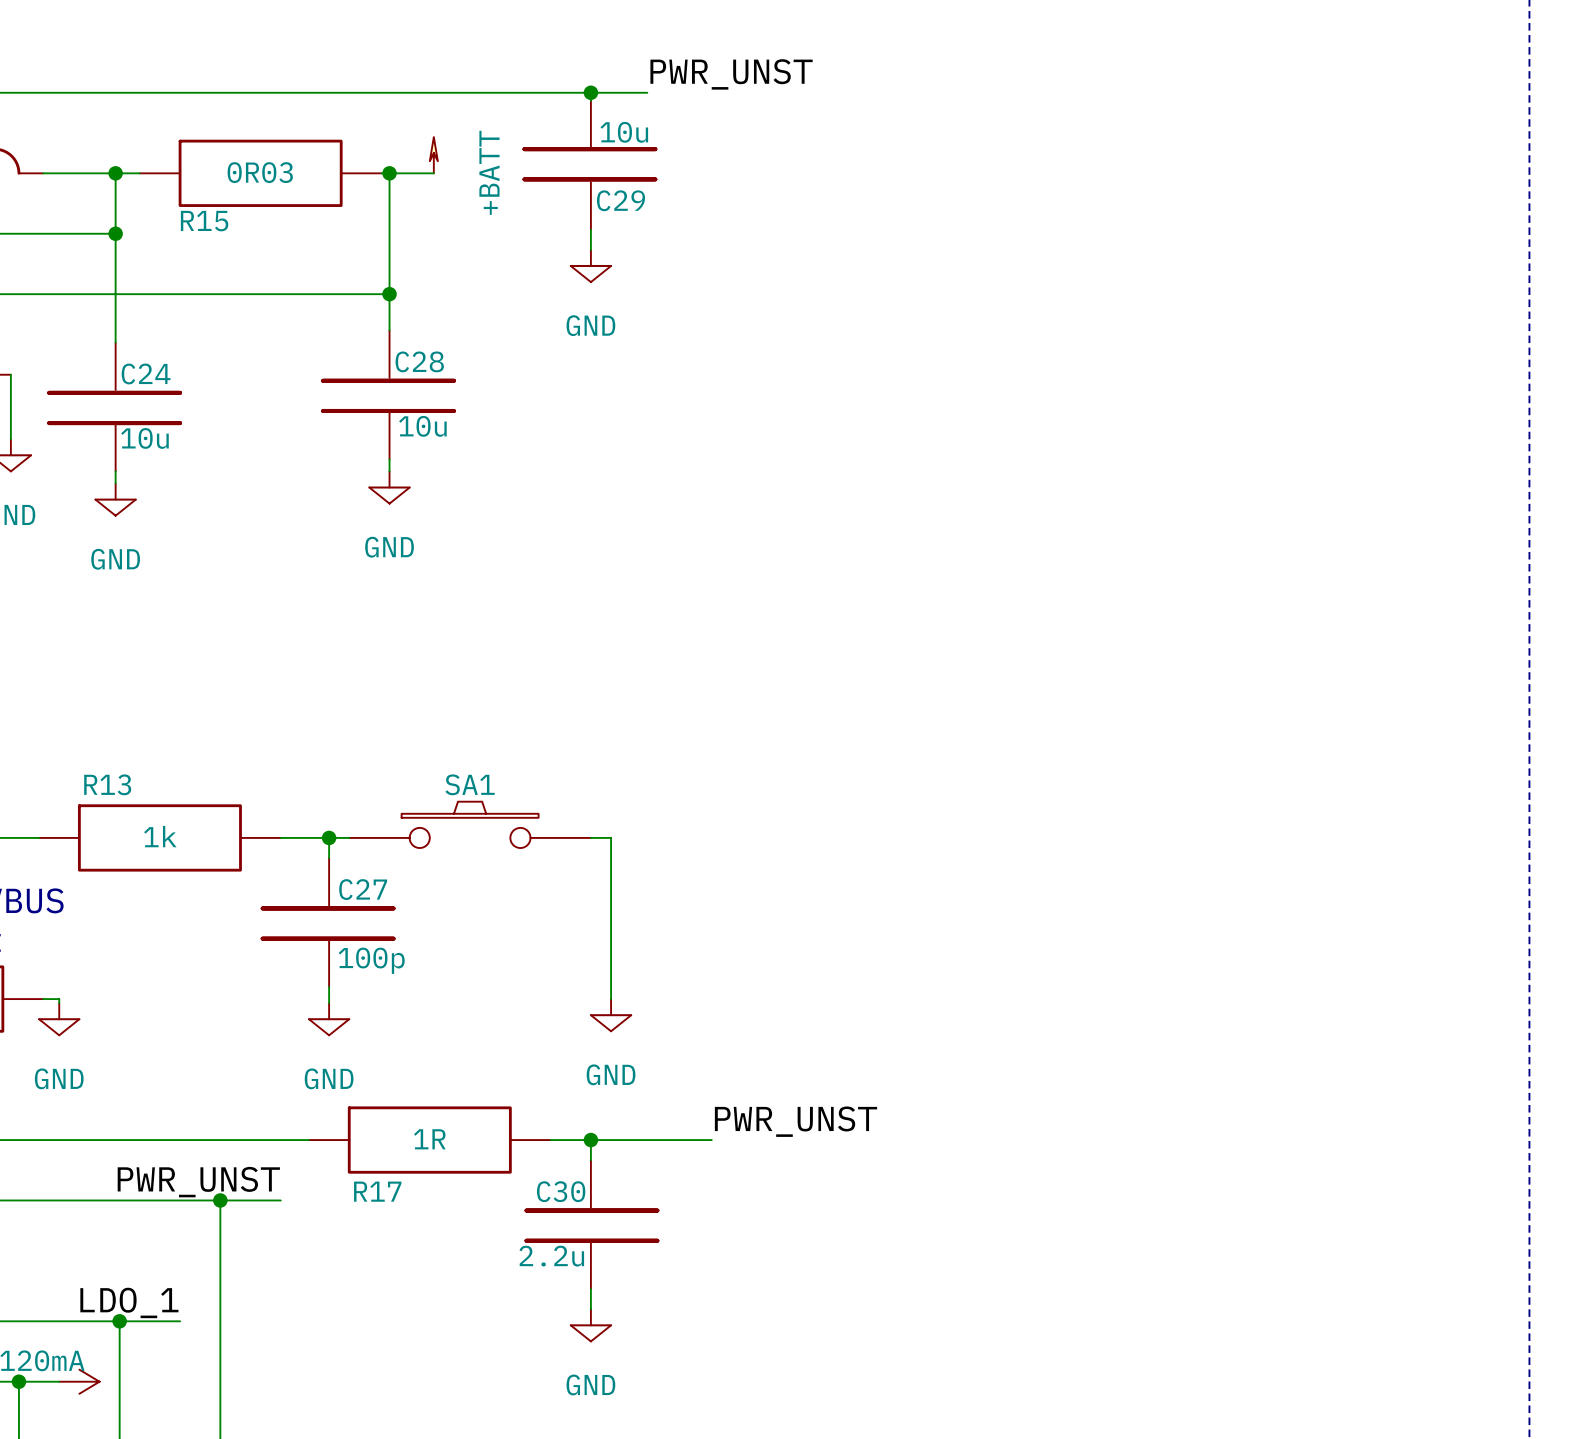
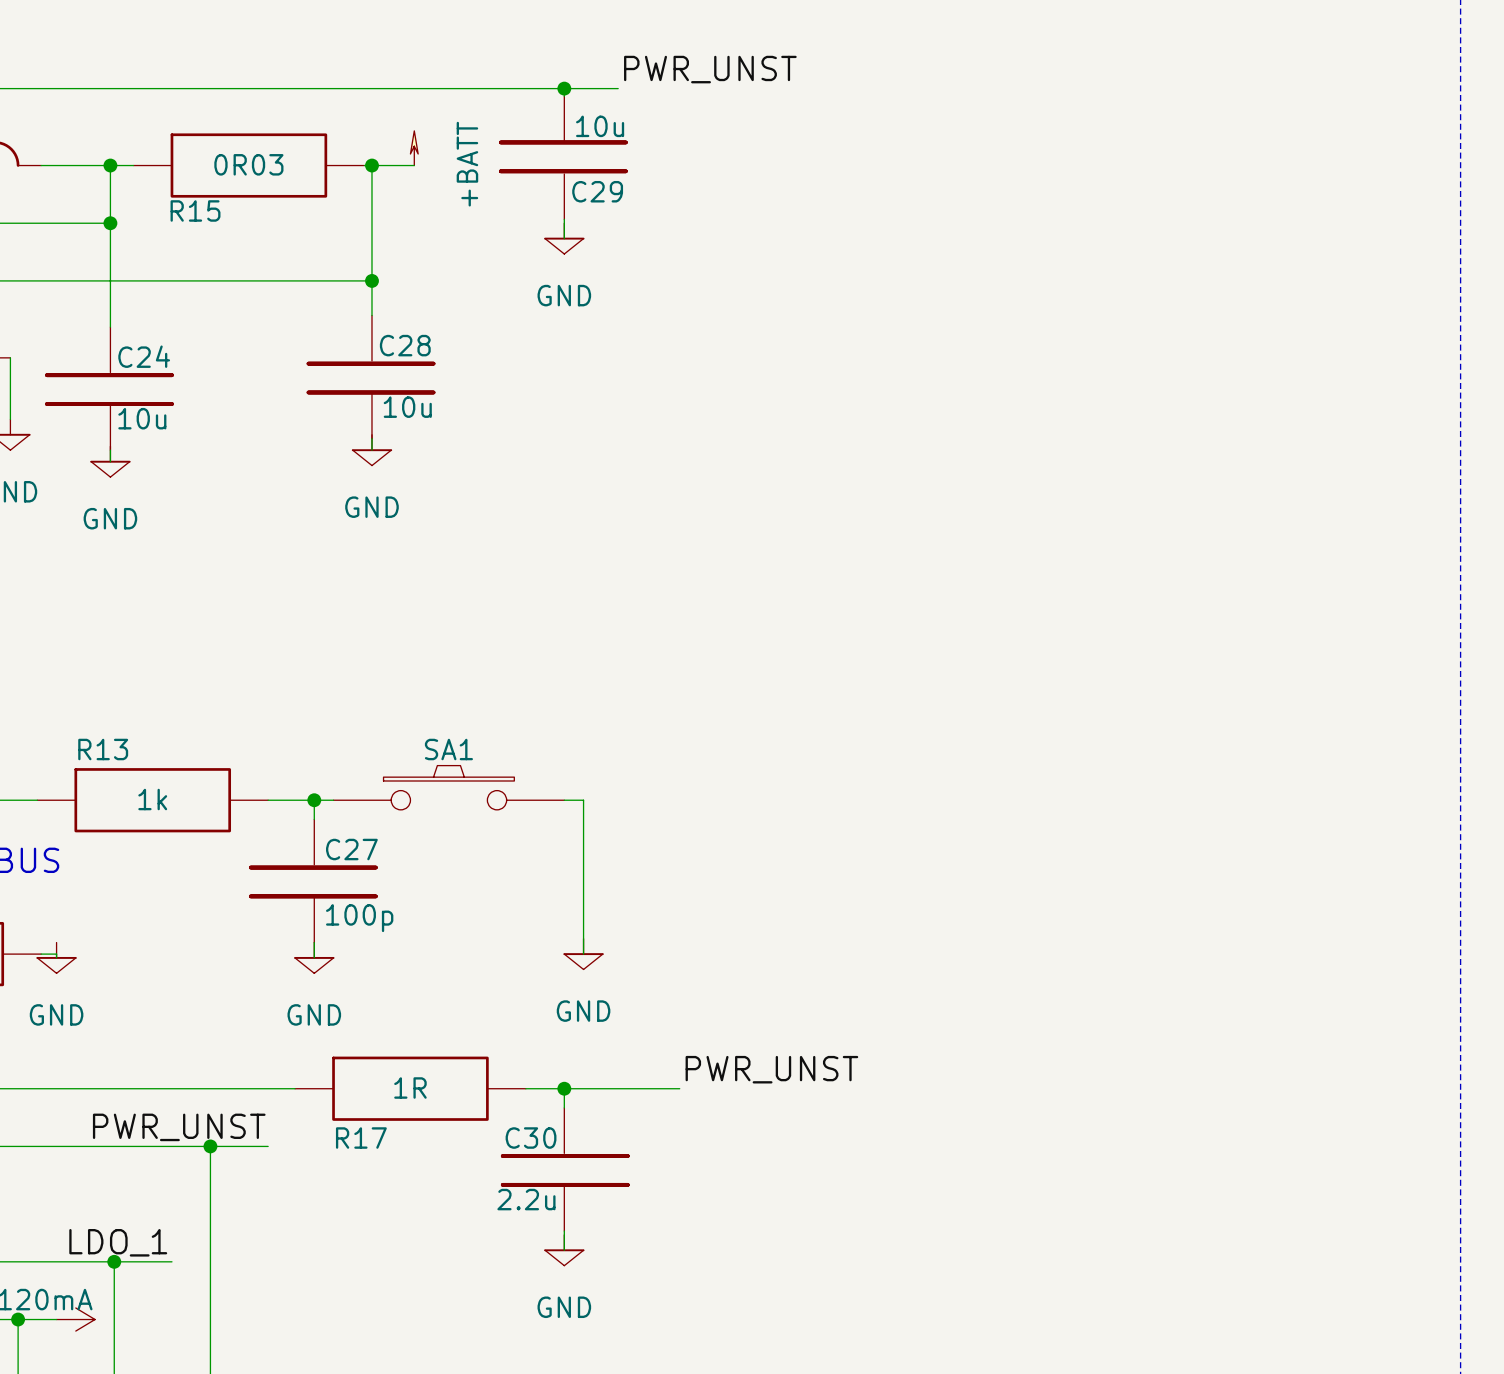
power symbol position: GND (590, 265) -> GND (564, 238)
power symbol position: GND (389, 487) -> GND (371, 450)
power symbol position: GND (115, 499) -> GND (110, 461)
power symbol position: GND (611, 1015) -> GND (583, 954)
power symbol position: GND (59, 1019) -> GND (56, 957)
power symbol position: GND (329, 1019) -> GND (314, 957)
power symbol position: GND (590, 1325) -> GND (564, 1250)

